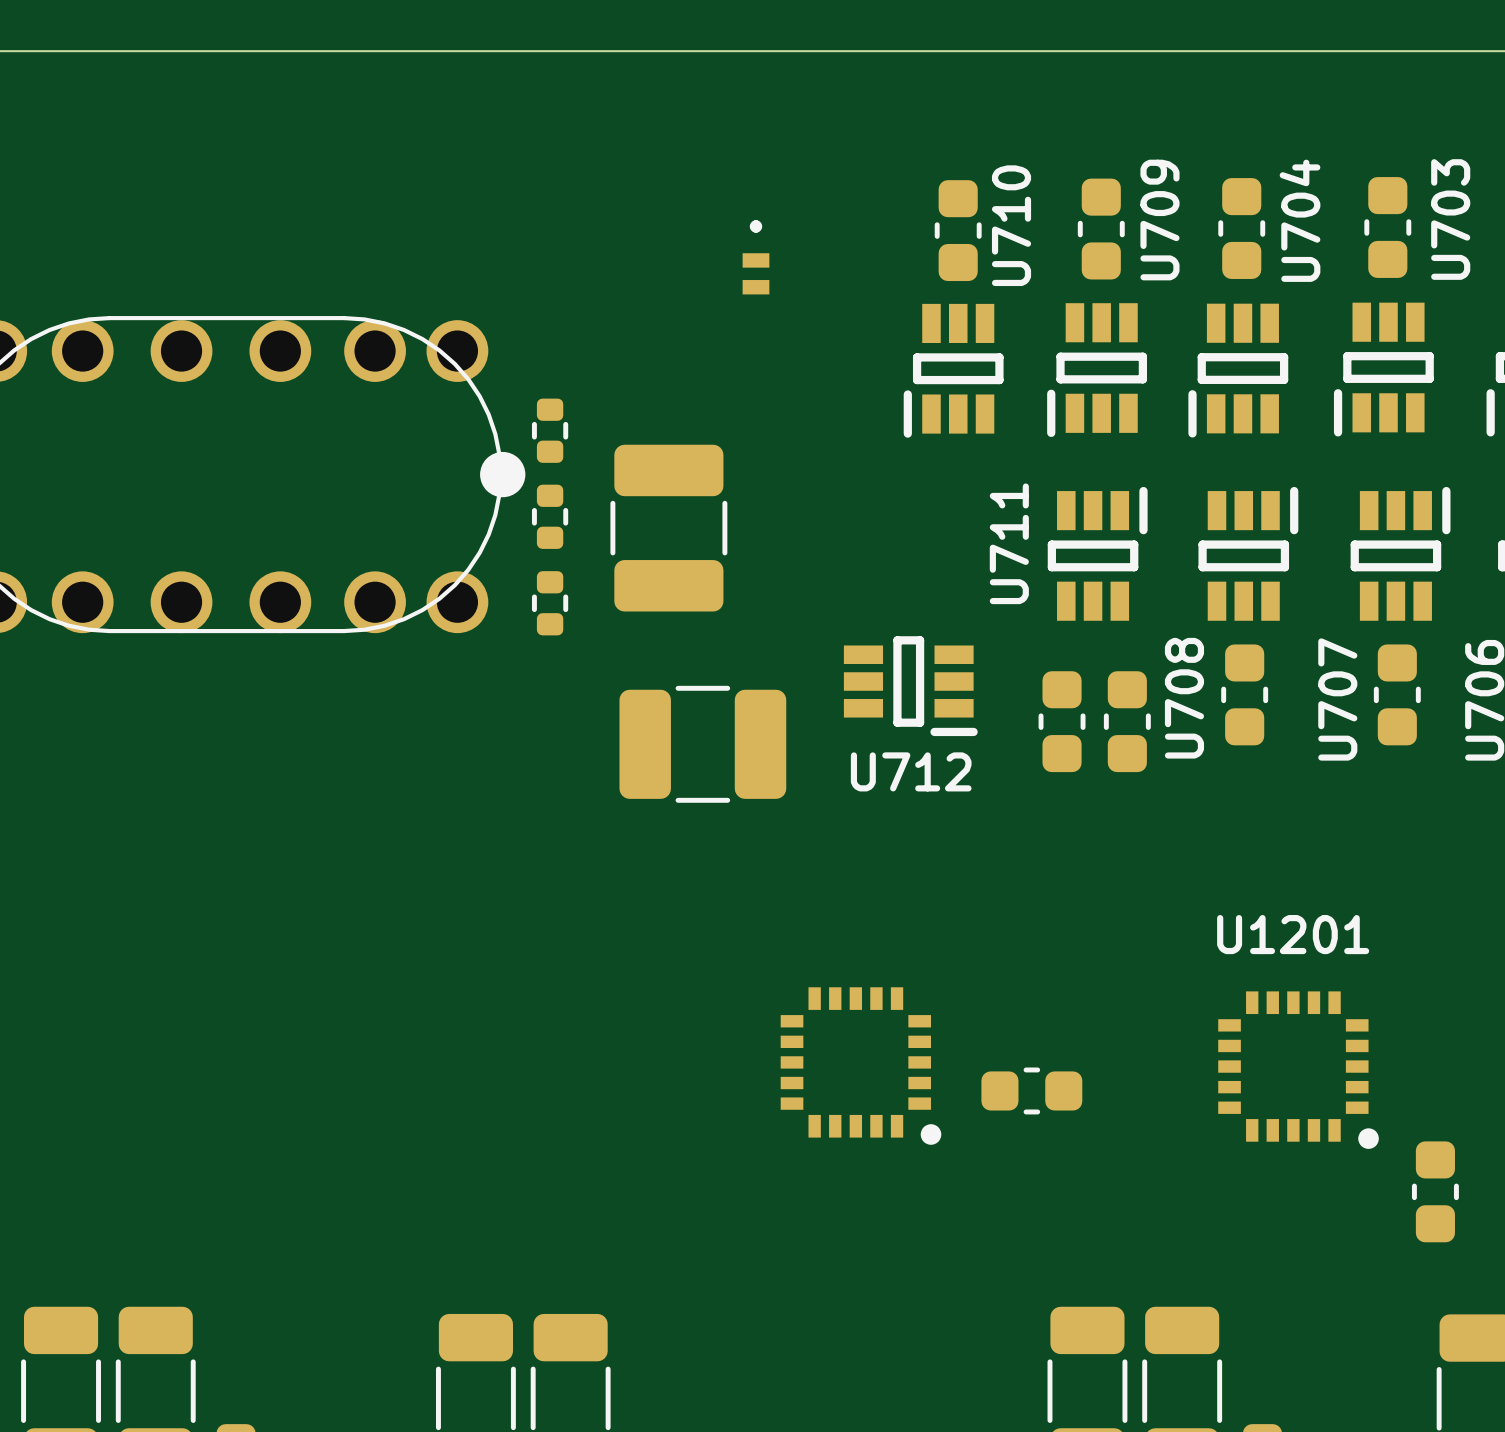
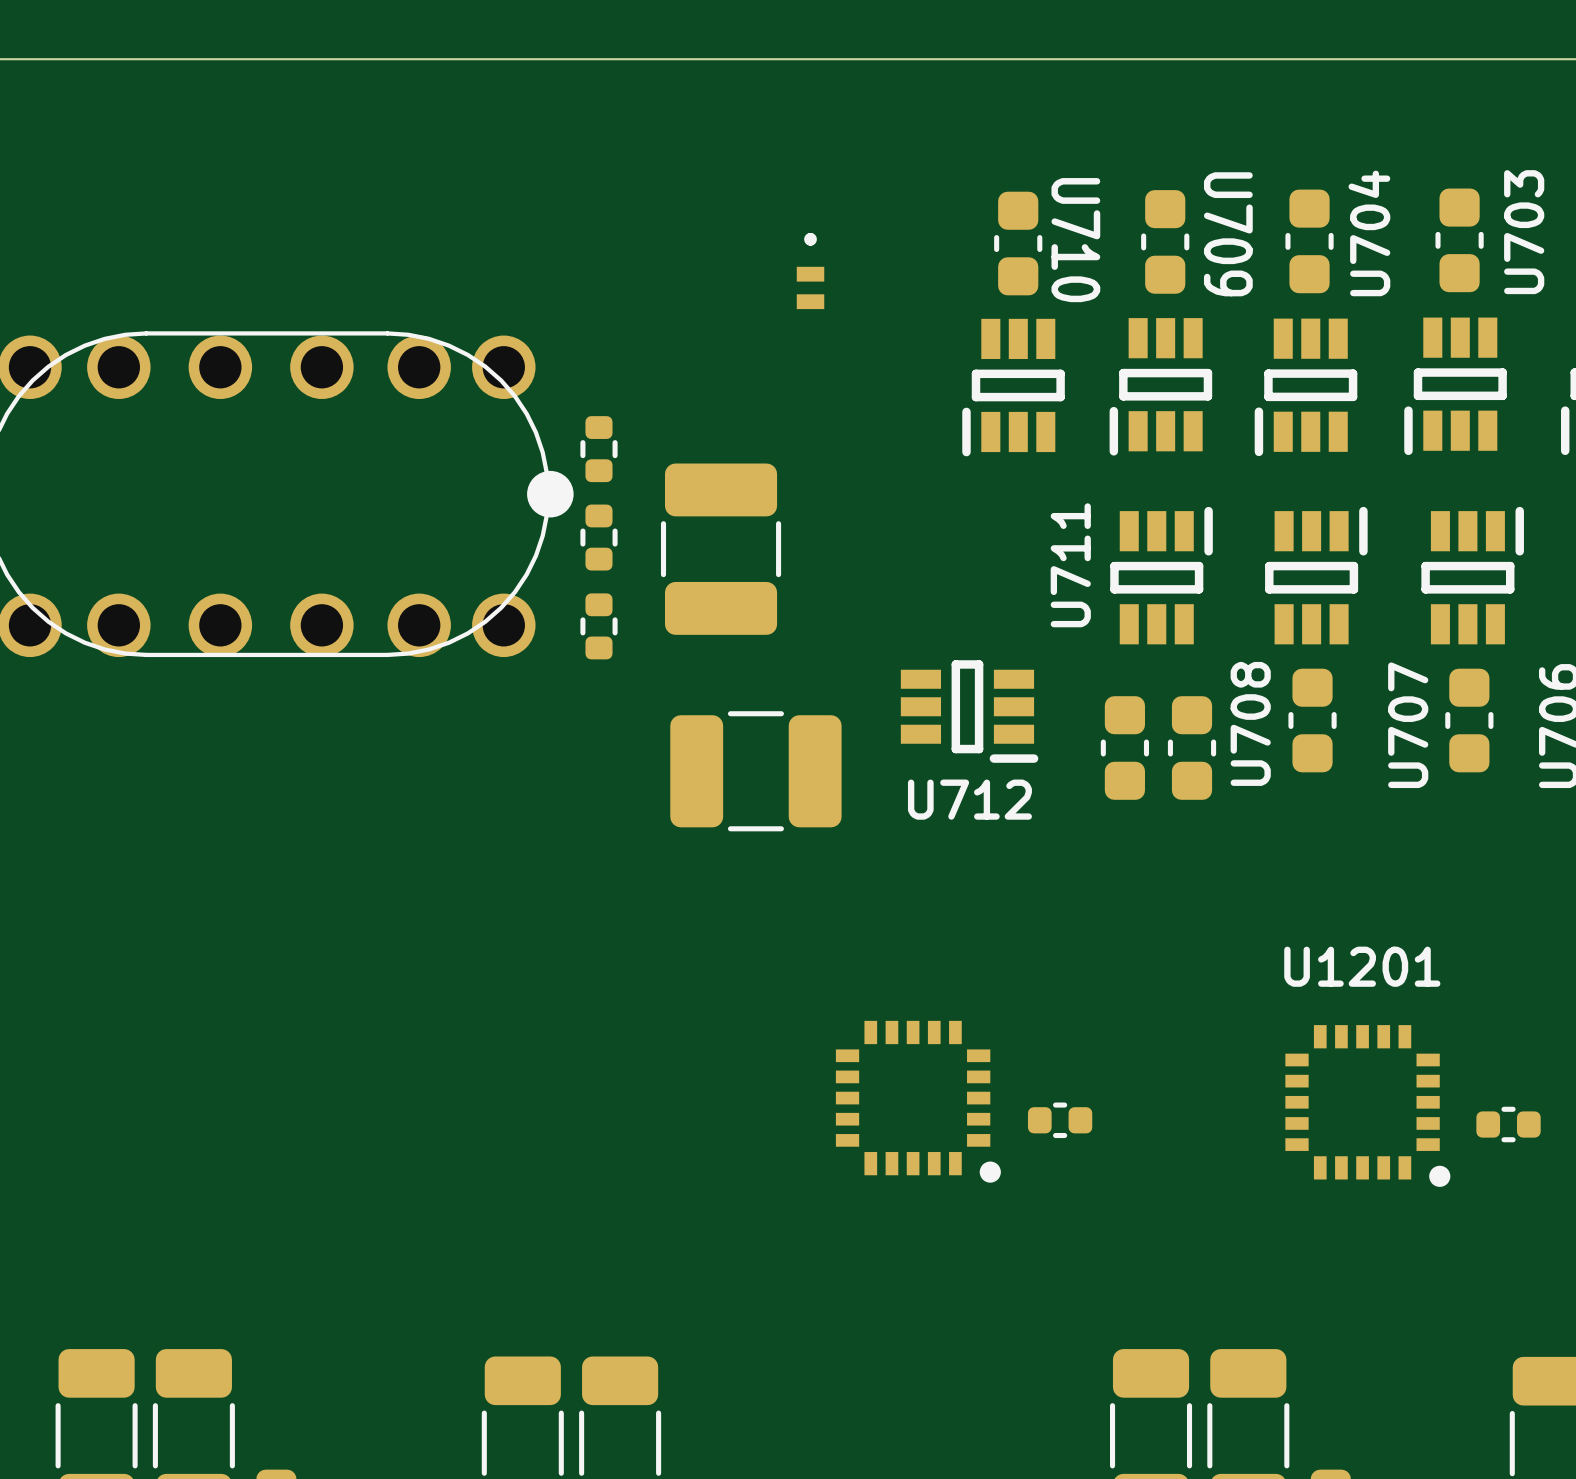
U709 name rotation: 0° (1159, 220) -> 180° (1228, 234)
U710 name rotation: 0° (1011, 225) -> 180° (1075, 240)
part footprint: [981, 1067, 1083, 1115] -> [1027, 1102, 1093, 1139]
part: none -> (1508, 1124)
part: (1435, 1191) -> none

